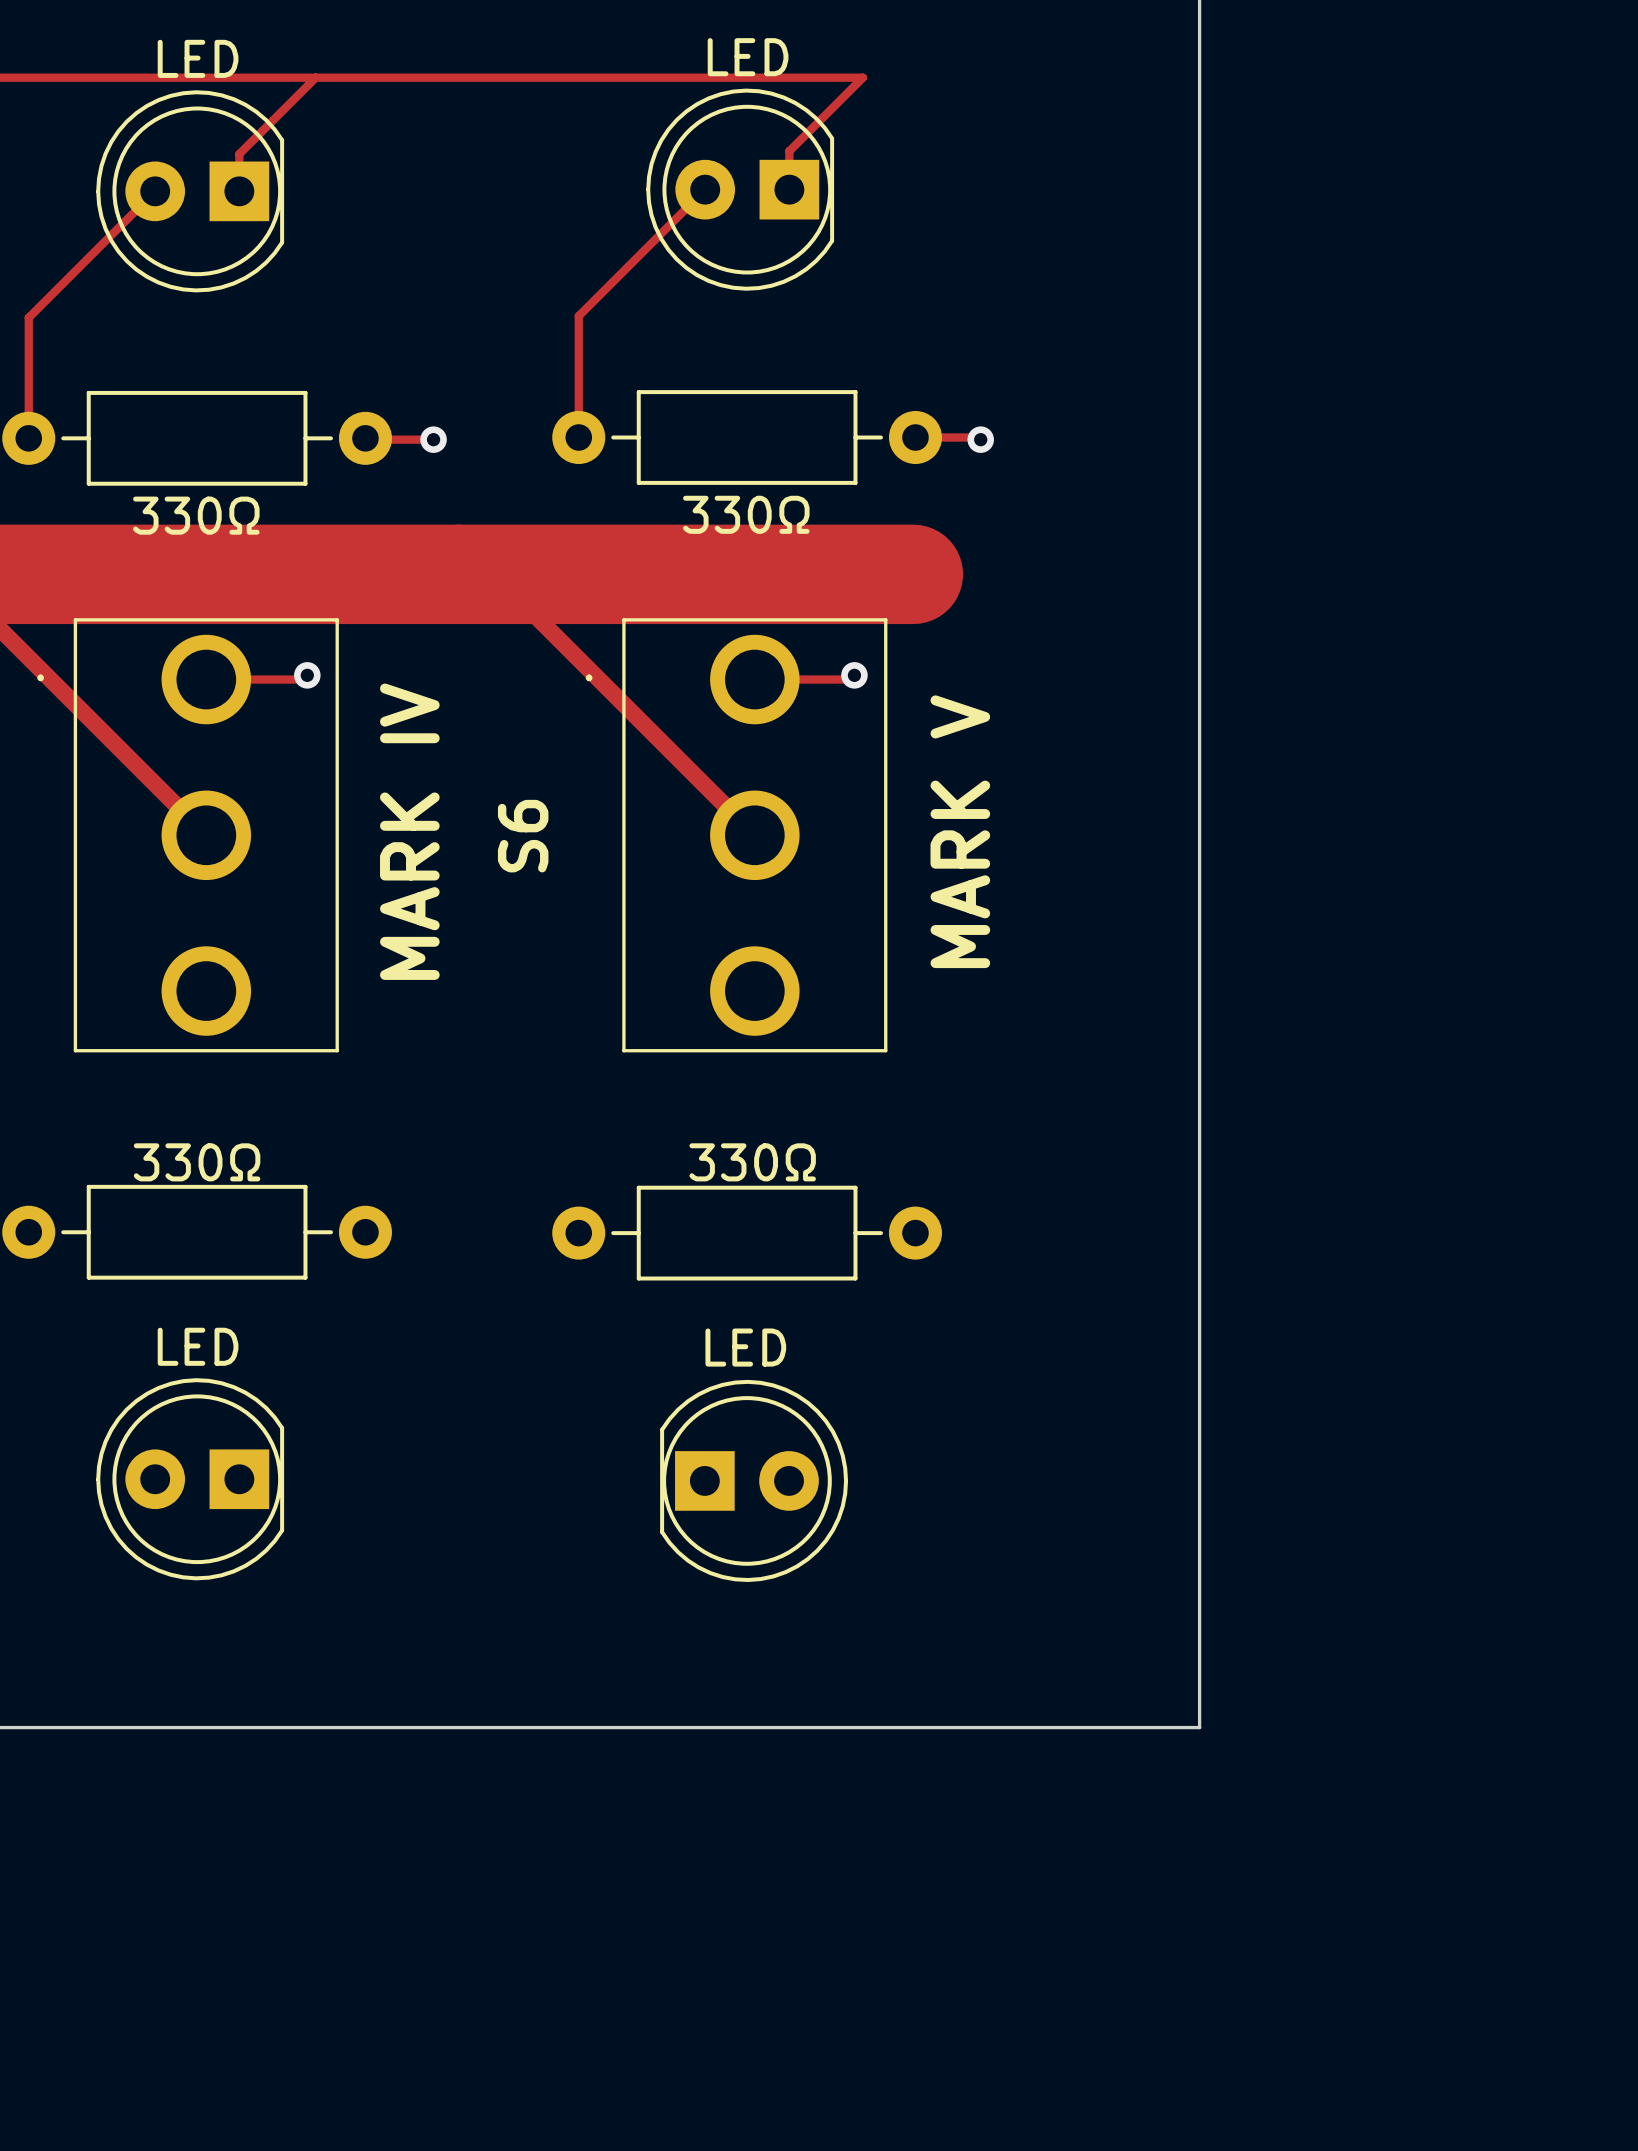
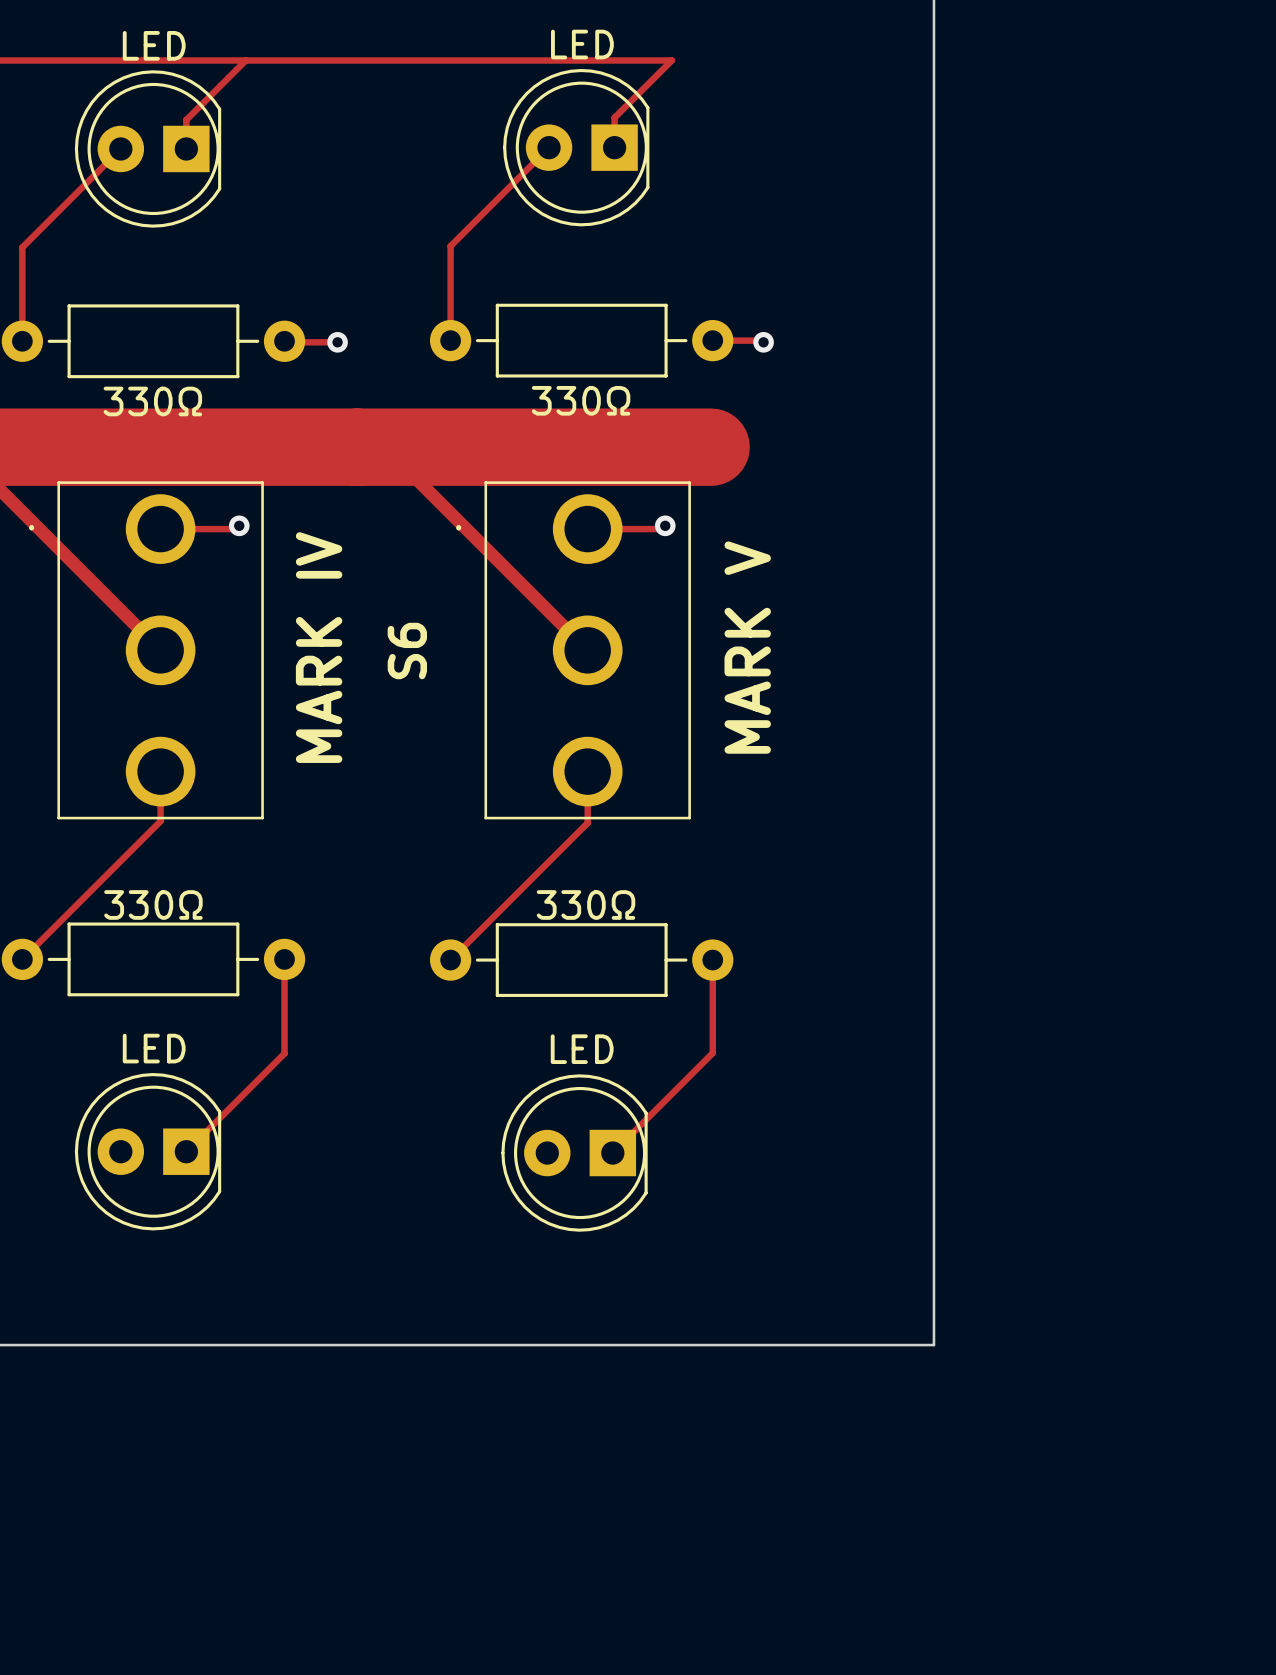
track: none -> (160, 771) (160, 821) (22, 959)
track: none -> (587, 771) (587, 822) (450, 960)
track: none -> (284, 959) (284, 1053) (186, 1151)
track: none -> (712, 960) (712, 1053) (612, 1153)
part rotation: 0° (754, 1480) -> 180° (574, 1153)

